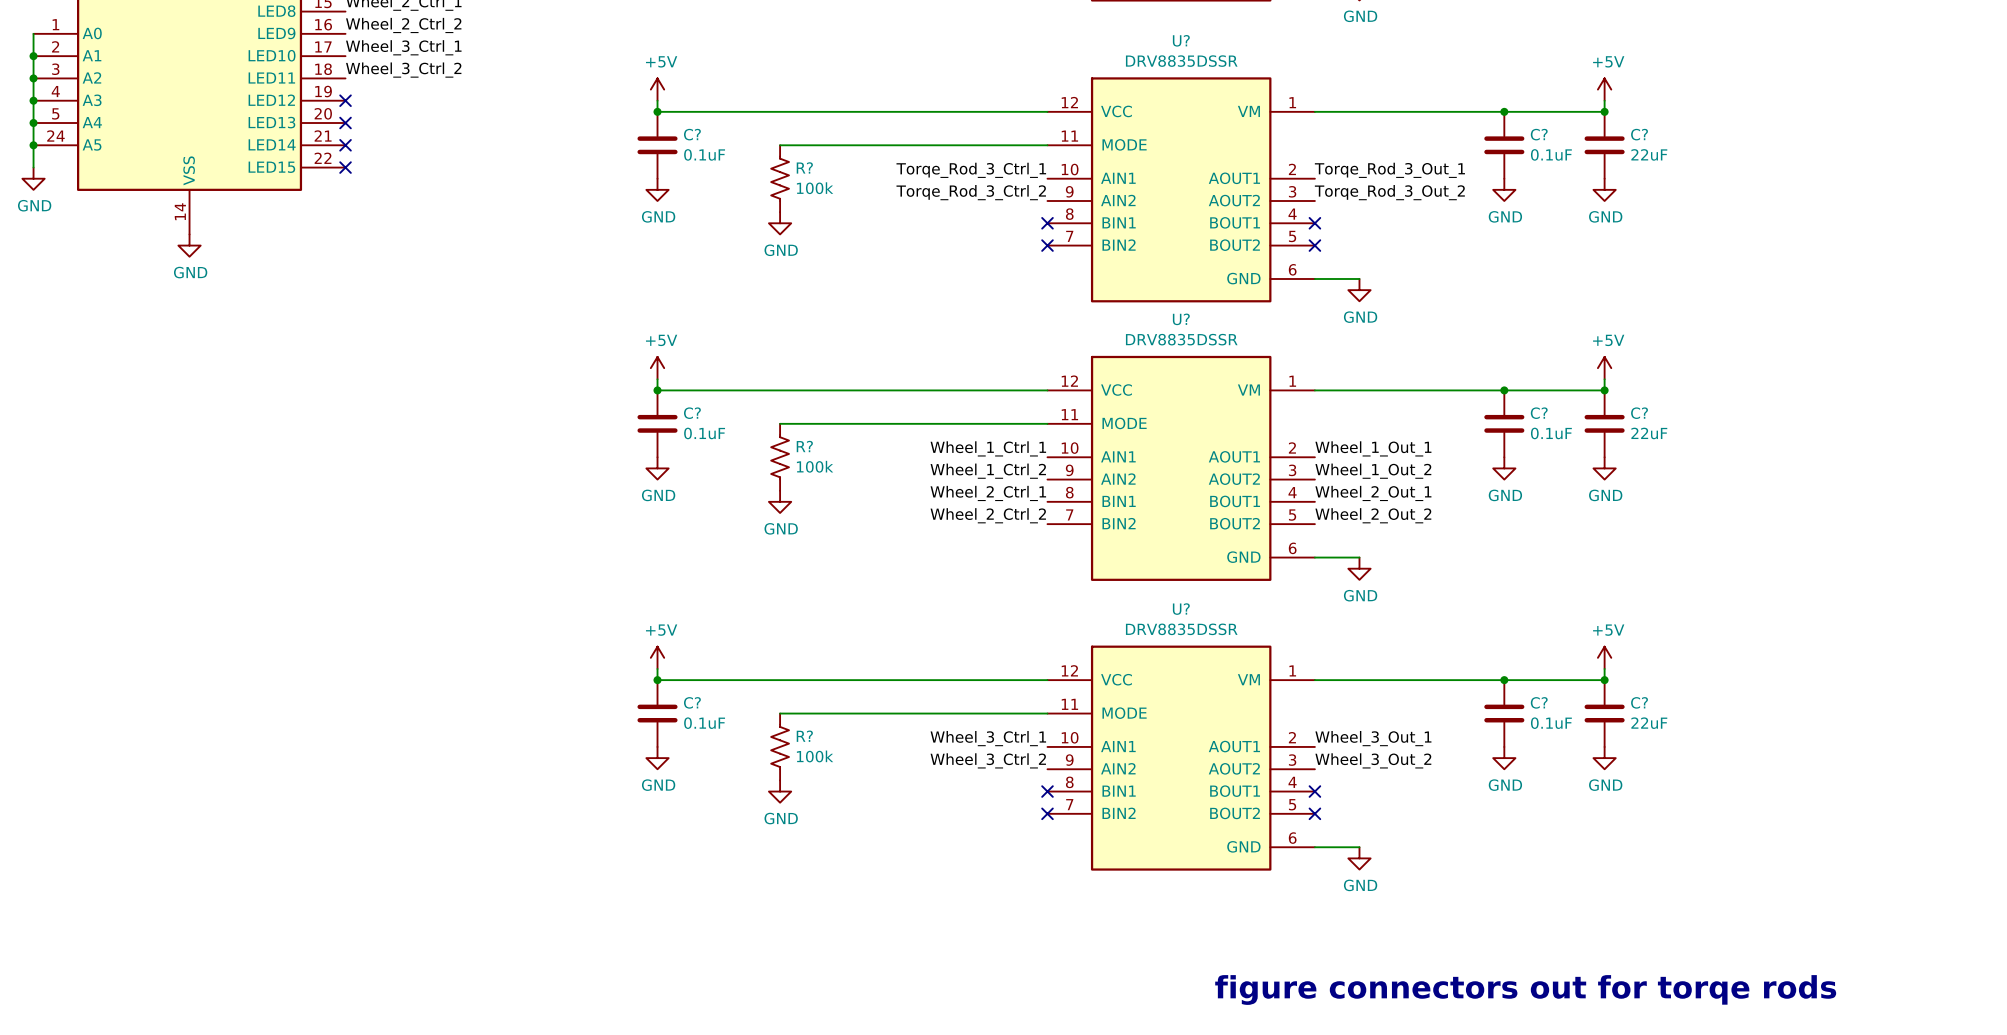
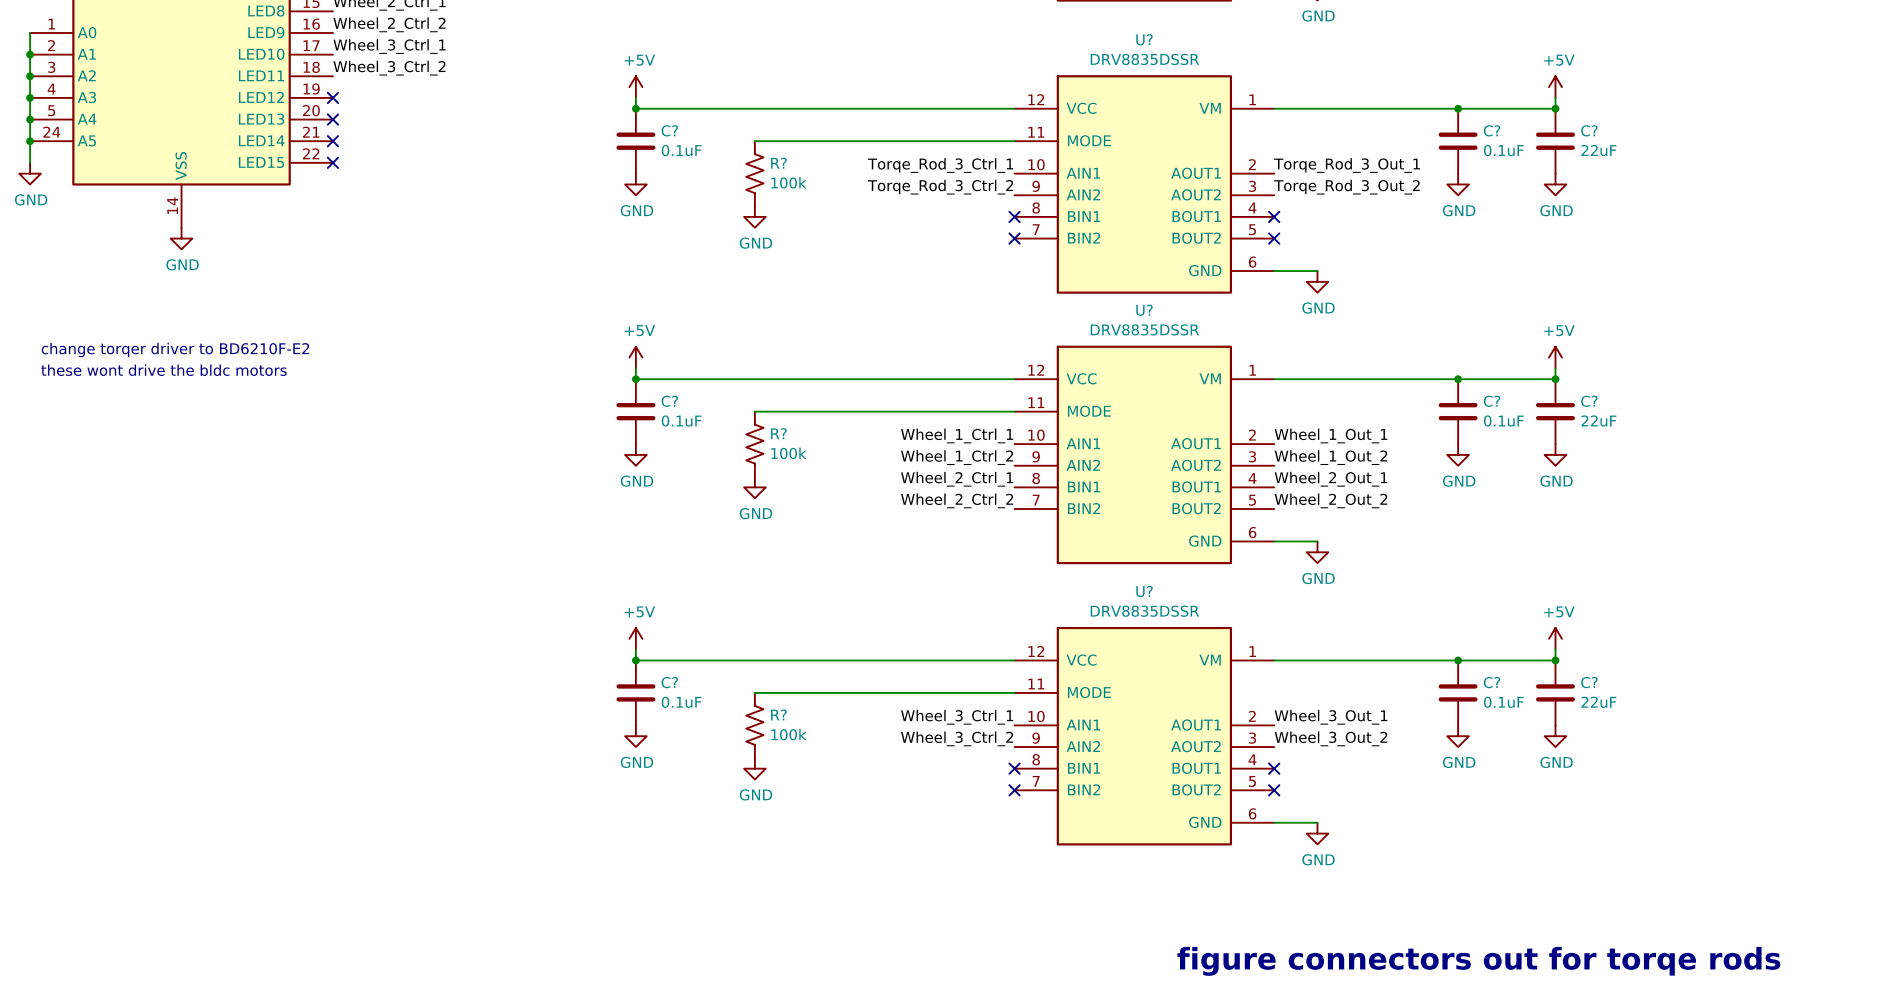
text: none -> change torqer driver to BD6210F-E2 (175, 350)
text: none -> these wont drive the bldc motors (163, 370)

